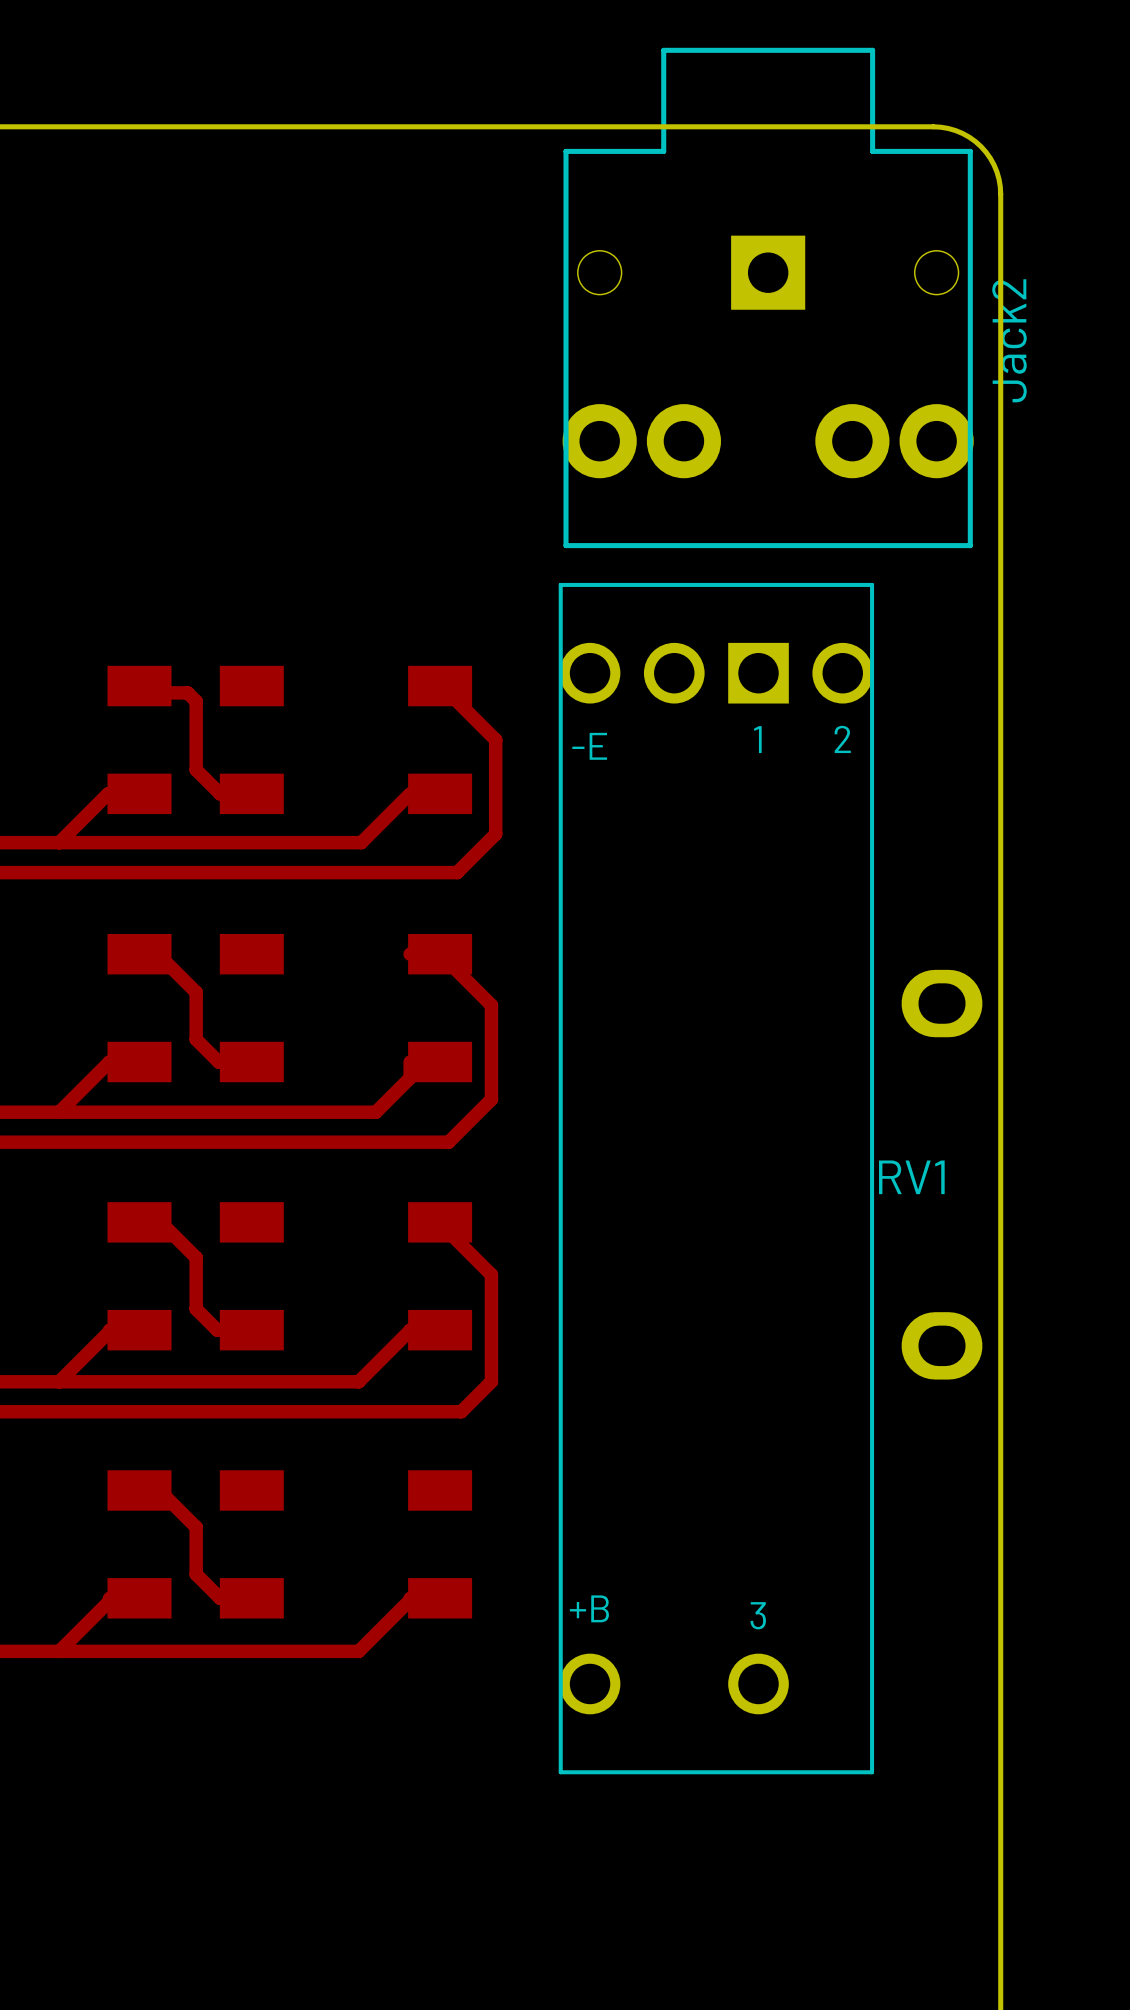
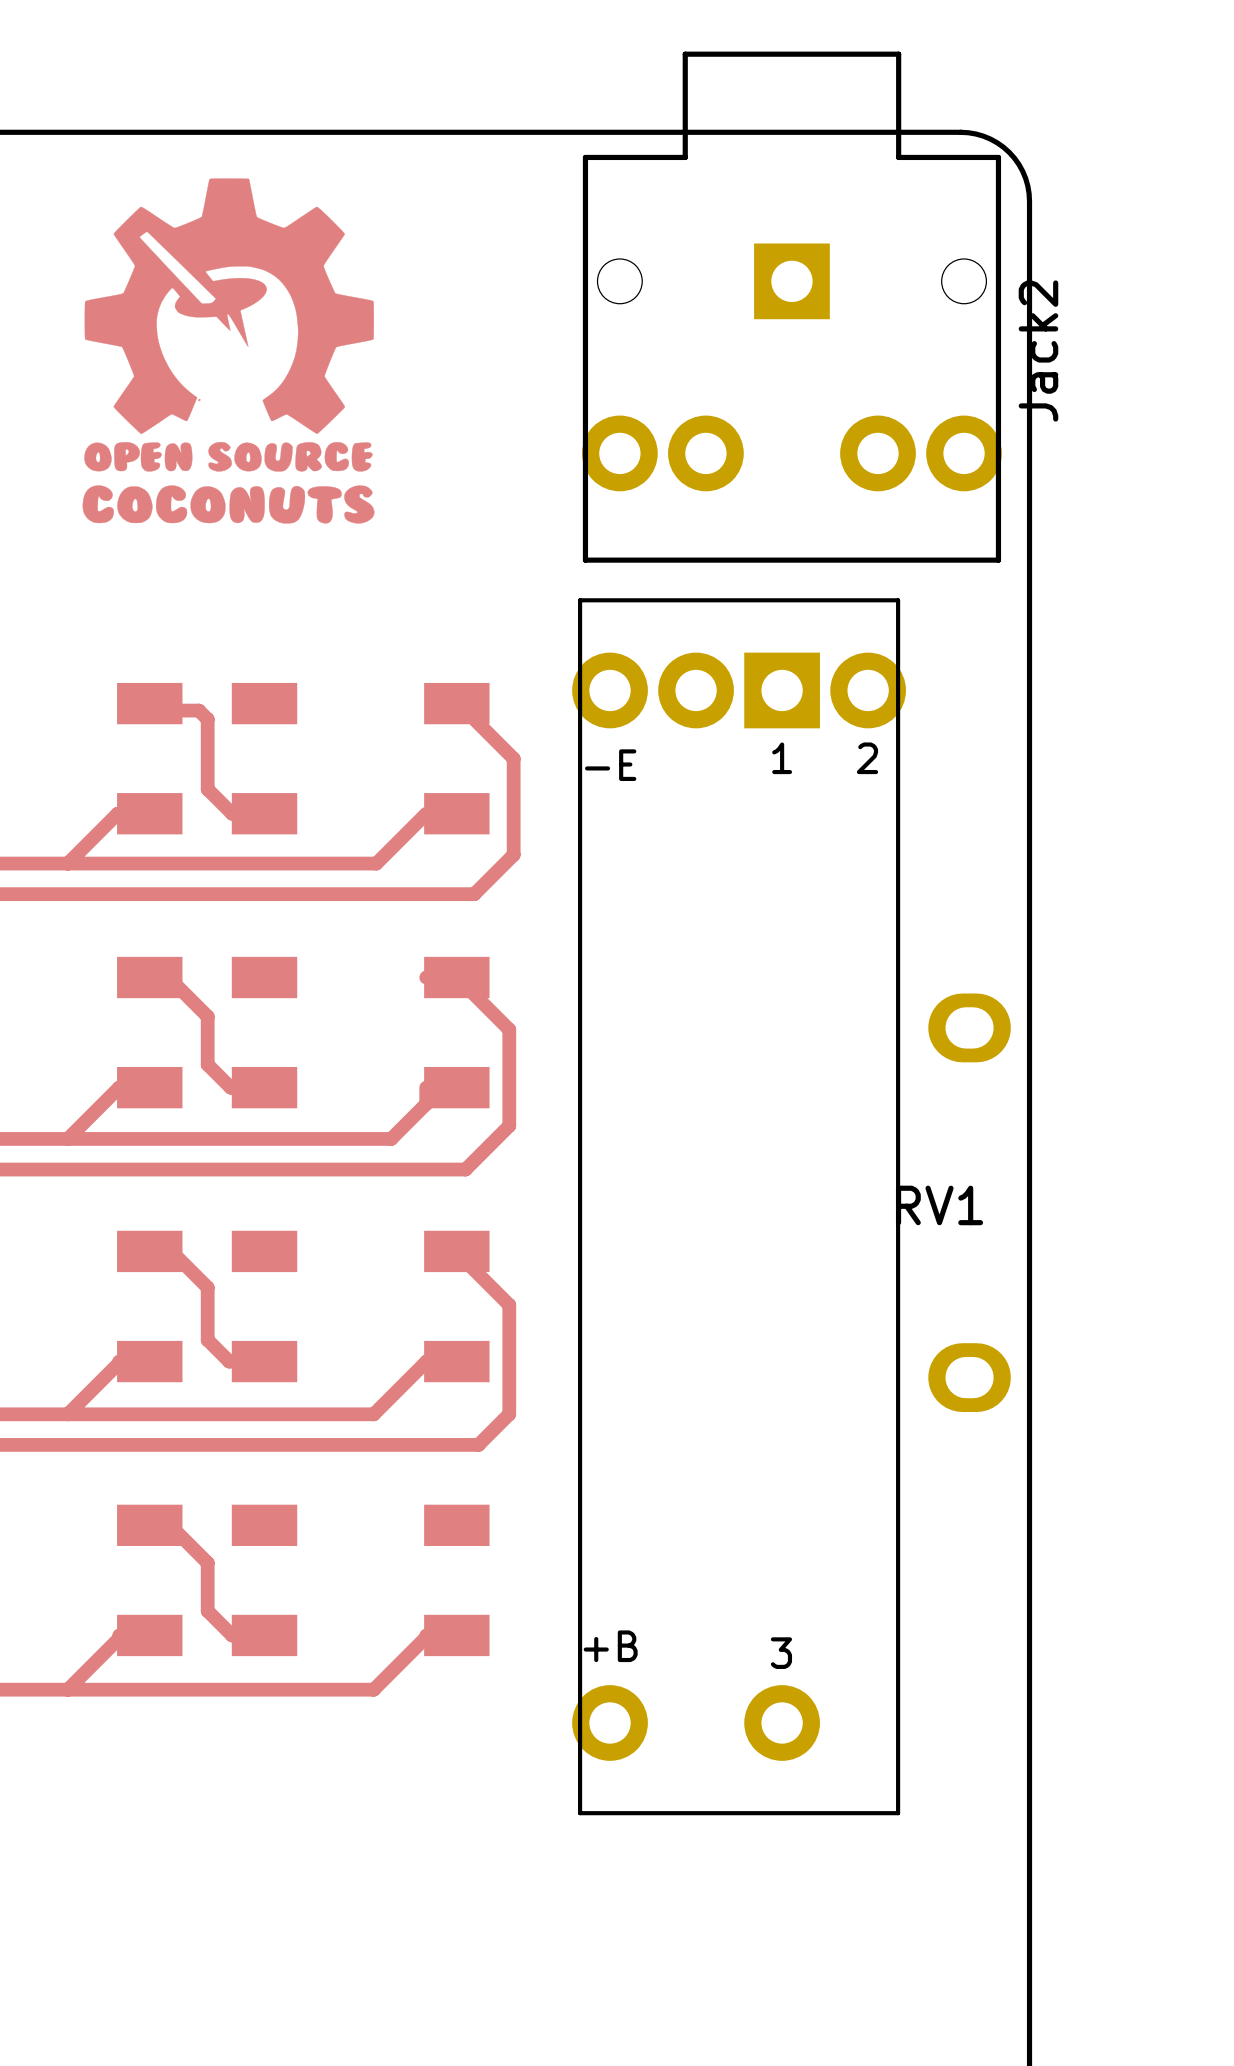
drawing: none -> [82, 178, 375, 524]
RV1 footprint: [558, 582, 875, 1775] -> [572, 598, 907, 1816]

